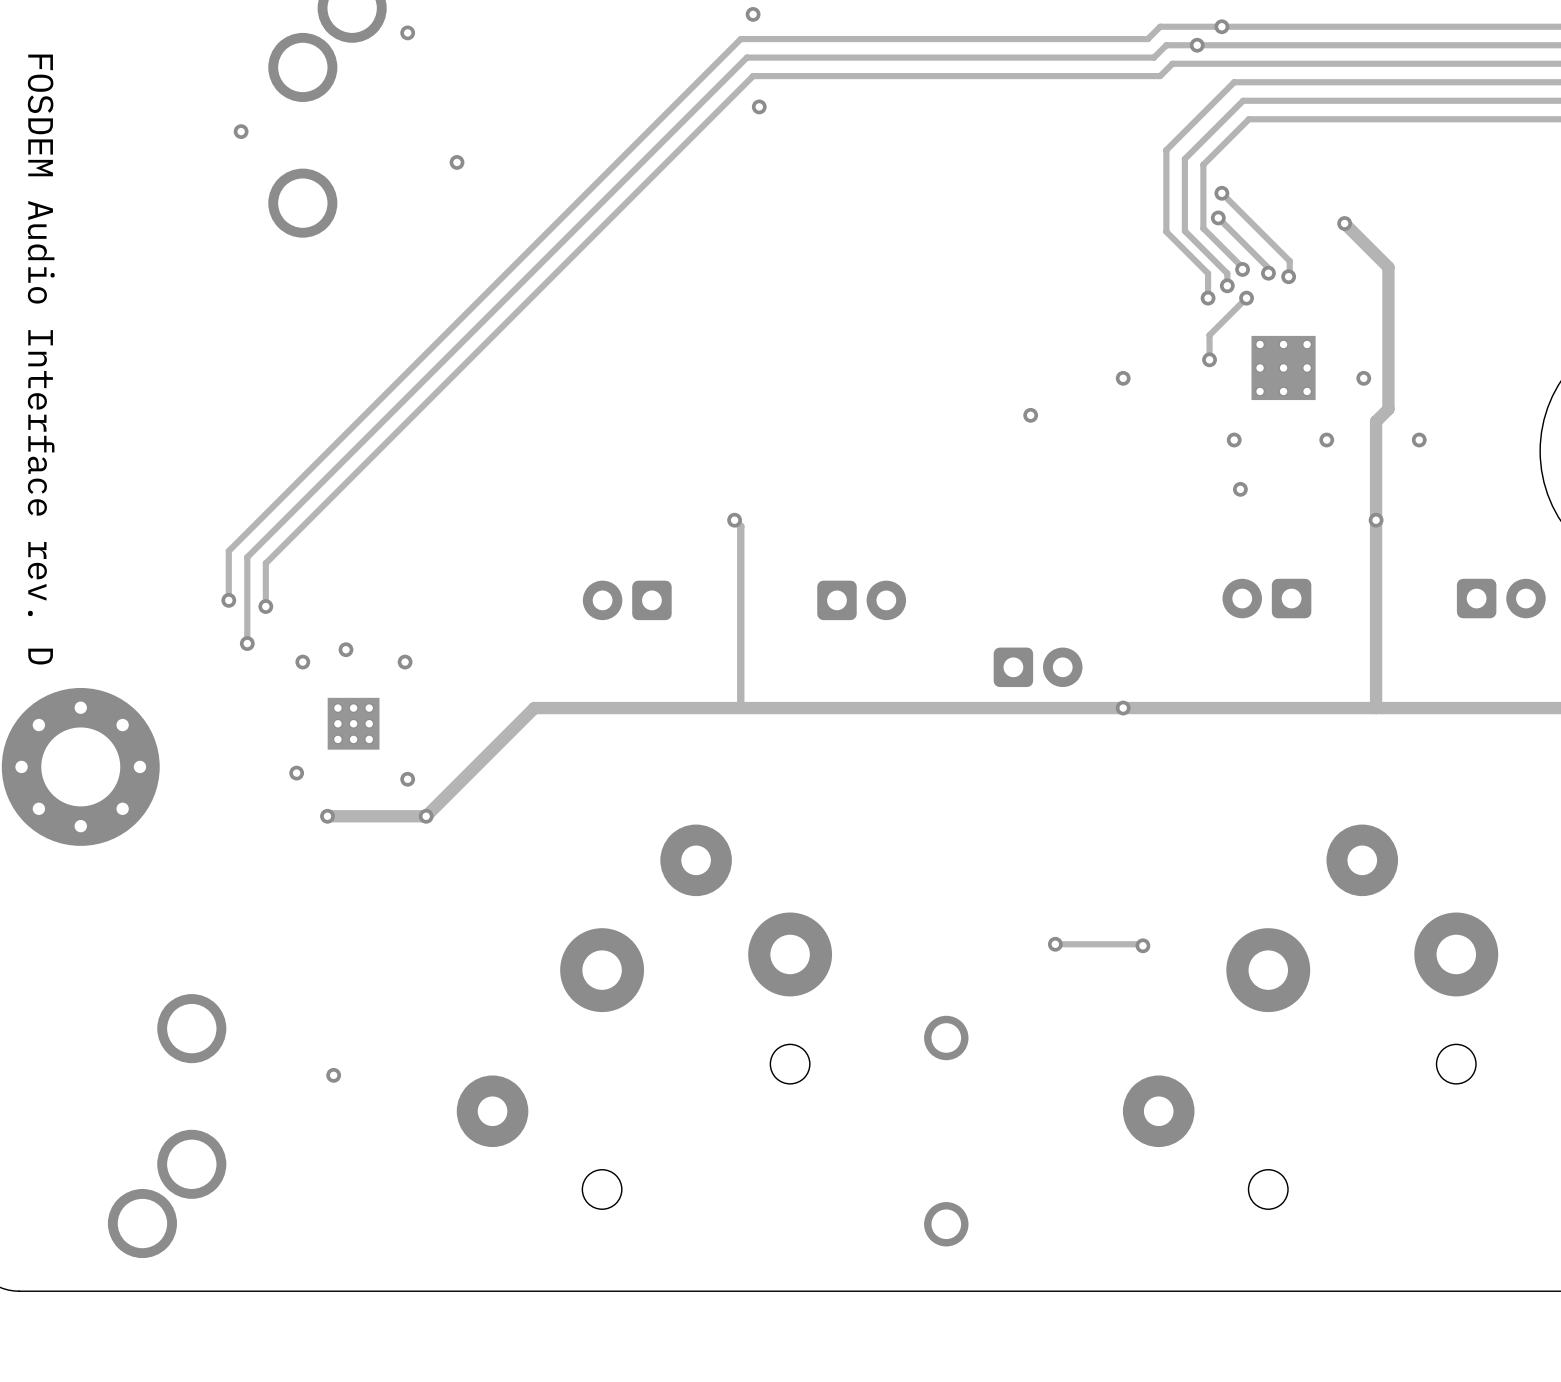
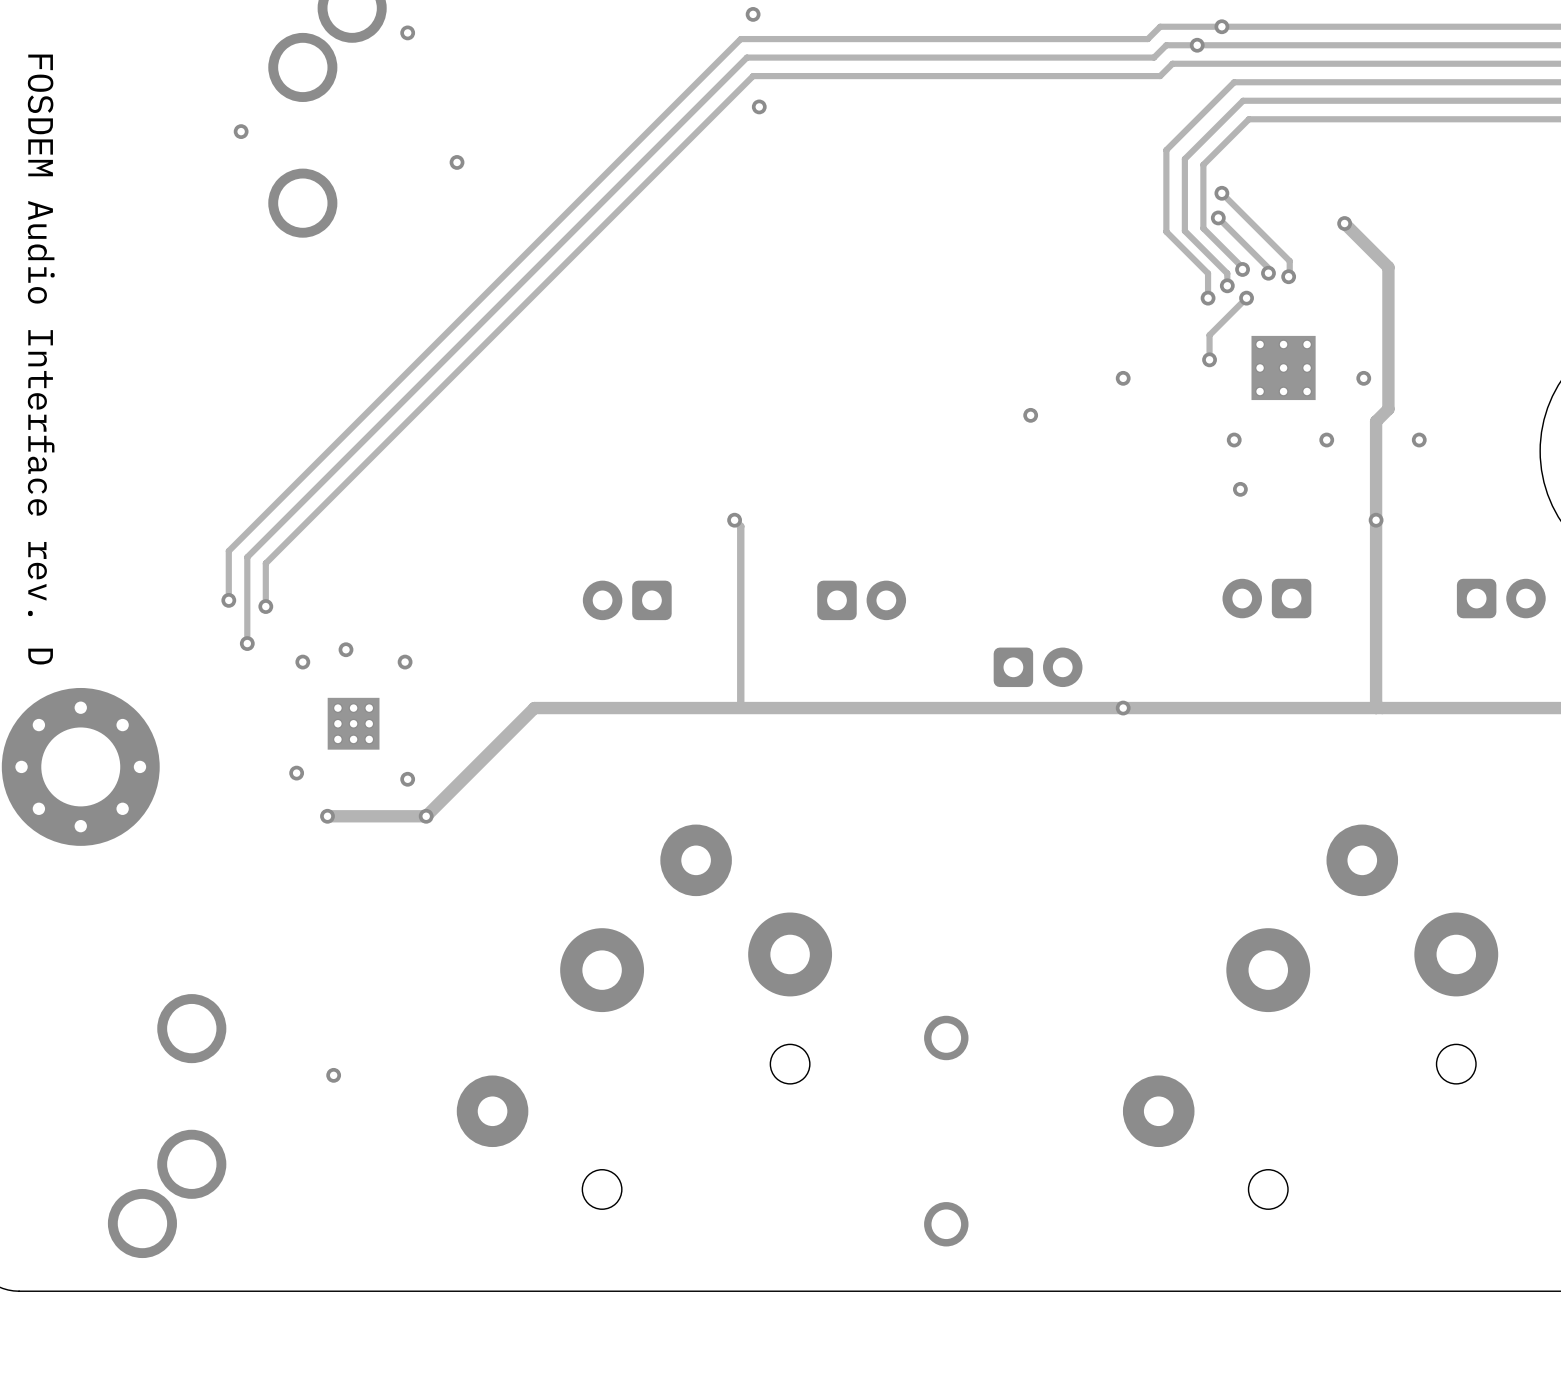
track: (1055, 944) (1141, 944) (1142, 945) -> none
via: (1055, 944) -> none
via: (1142, 945) -> none

